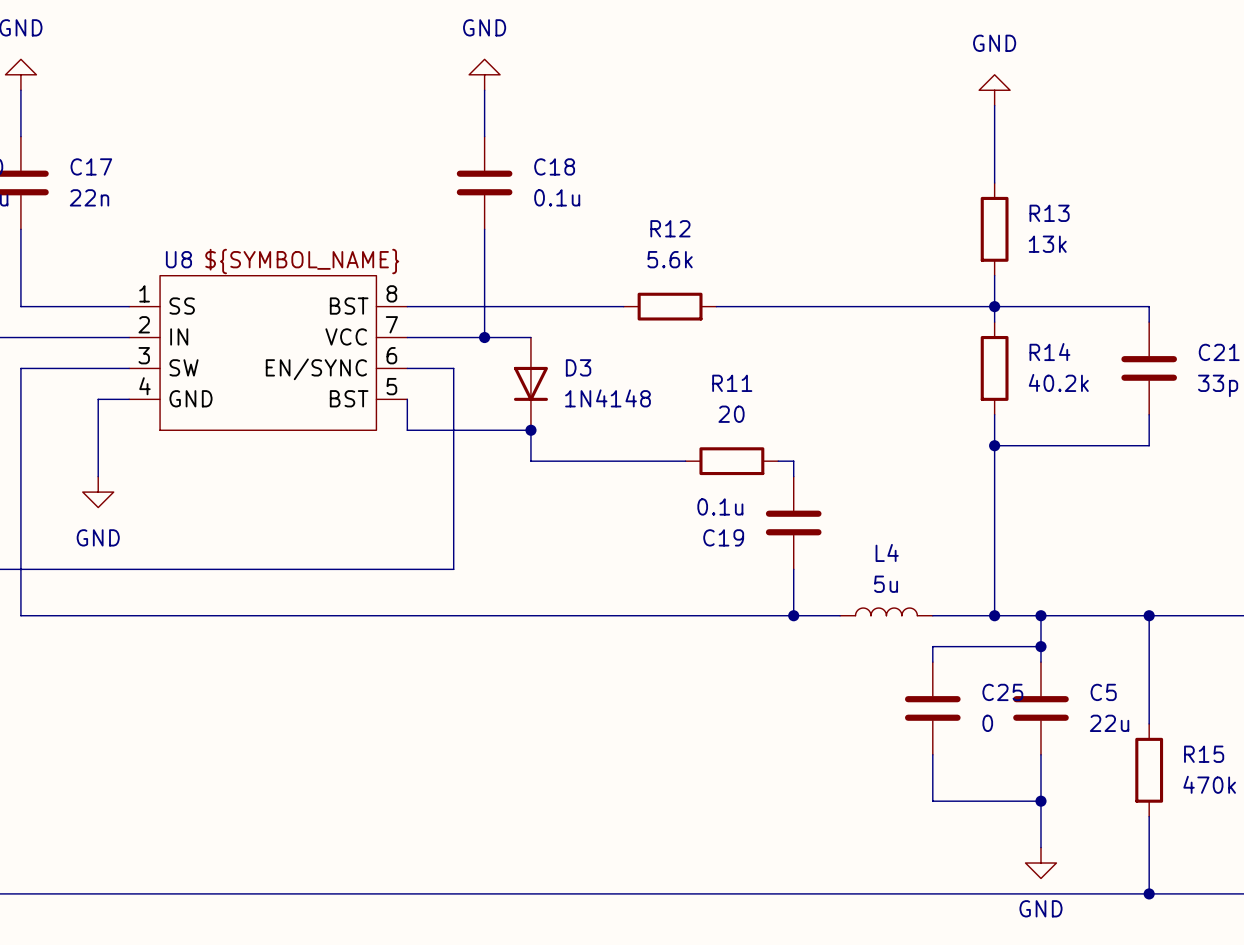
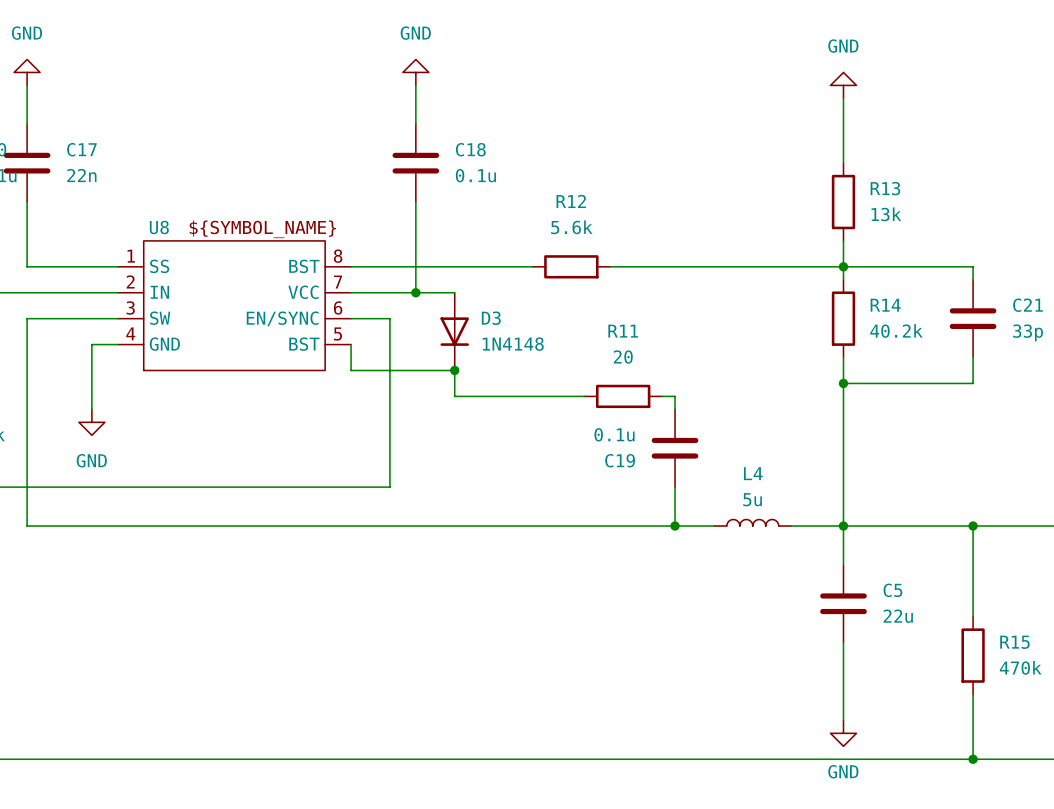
wire: (1040, 615) (1040, 662) -> (843, 526) (843, 564)
junction: (1040, 615) -> none
wire: (1040, 646) (932, 646) (932, 662) -> none
junction: (1040, 646) -> none
C25: 0 (932, 708) -> none
C5 position: (1040, 708) -> (843, 603)
wire: (932, 754) (932, 801) (1040, 801) -> none
wire: (1040, 754) (1040, 847) -> (843, 642) (843, 720)
junction: (1040, 801) -> none
power symbol position: GND (1040, 863) -> GND (843, 733)

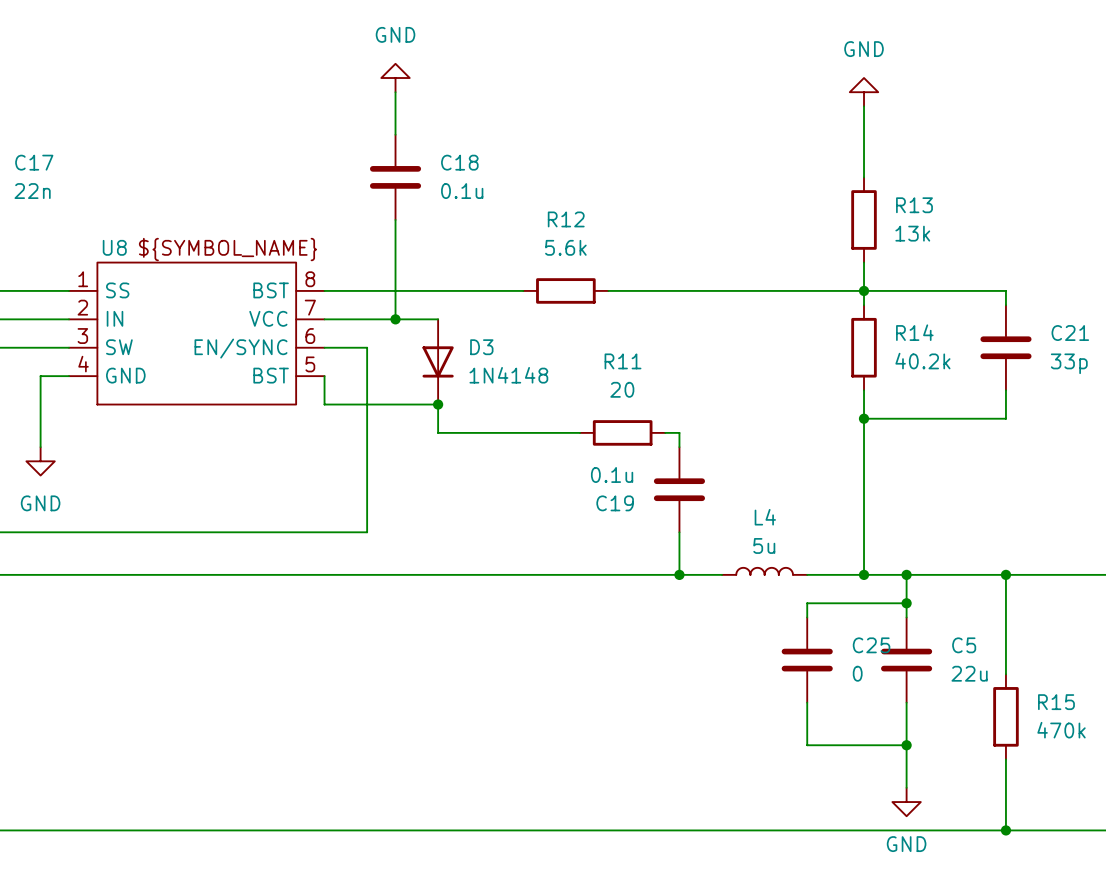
wire: (843, 526) (843, 564) -> (906, 574) (906, 617)
junction: none -> (906, 574)
wire: none -> (906, 603) (807, 603) (807, 617)
junction: none -> (906, 603)
C25: none -> 0 (807, 660)
C5 position: (843, 603) -> (906, 660)
wire: none -> (807, 702) (807, 745) (906, 745)
wire: (843, 642) (843, 720) -> (906, 702) (906, 787)
junction: none -> (906, 745)
power symbol position: GND (843, 733) -> GND (906, 802)

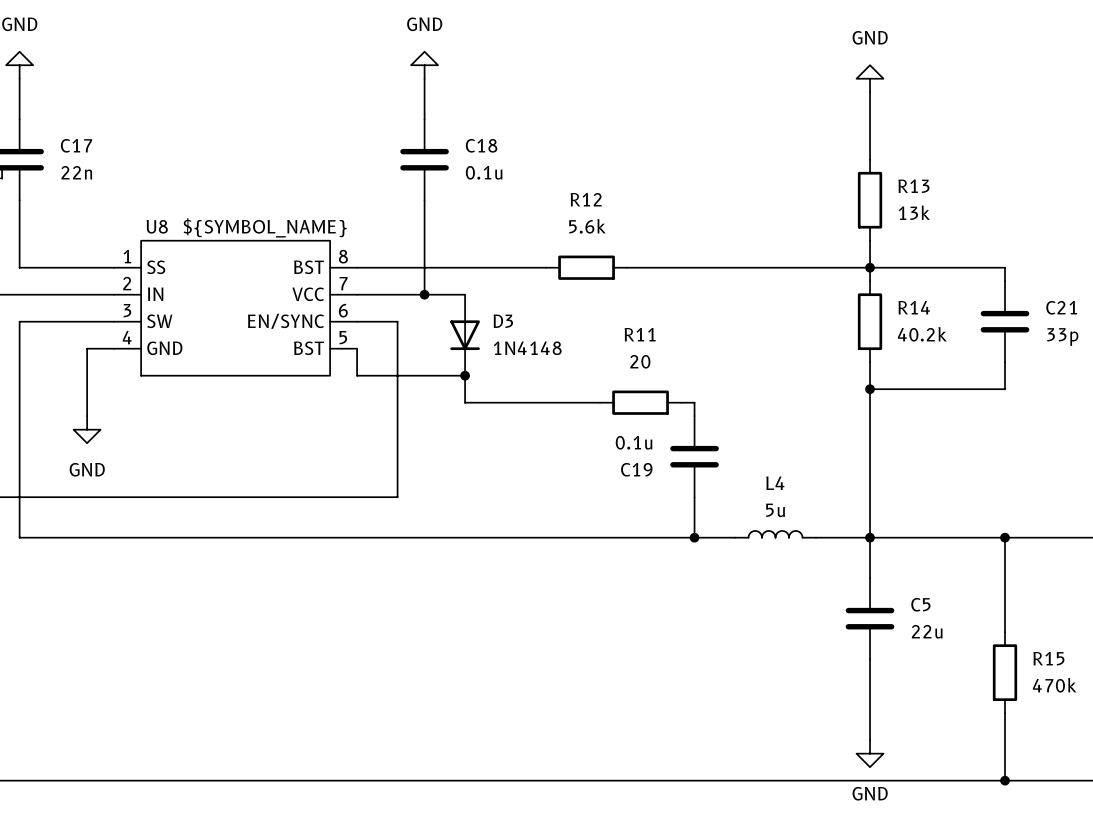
wire: (906, 574) (906, 617) -> (870, 537) (870, 578)
junction: (906, 574) -> none
wire: (906, 603) (807, 603) (807, 617) -> none
junction: (906, 603) -> none
C25: 0 (807, 660) -> none
C5 position: (906, 660) -> (870, 618)
wire: (807, 702) (807, 745) (906, 745) -> none
wire: (906, 702) (906, 787) -> (870, 659) (870, 740)
junction: (906, 745) -> none
power symbol position: GND (906, 802) -> GND (870, 753)

